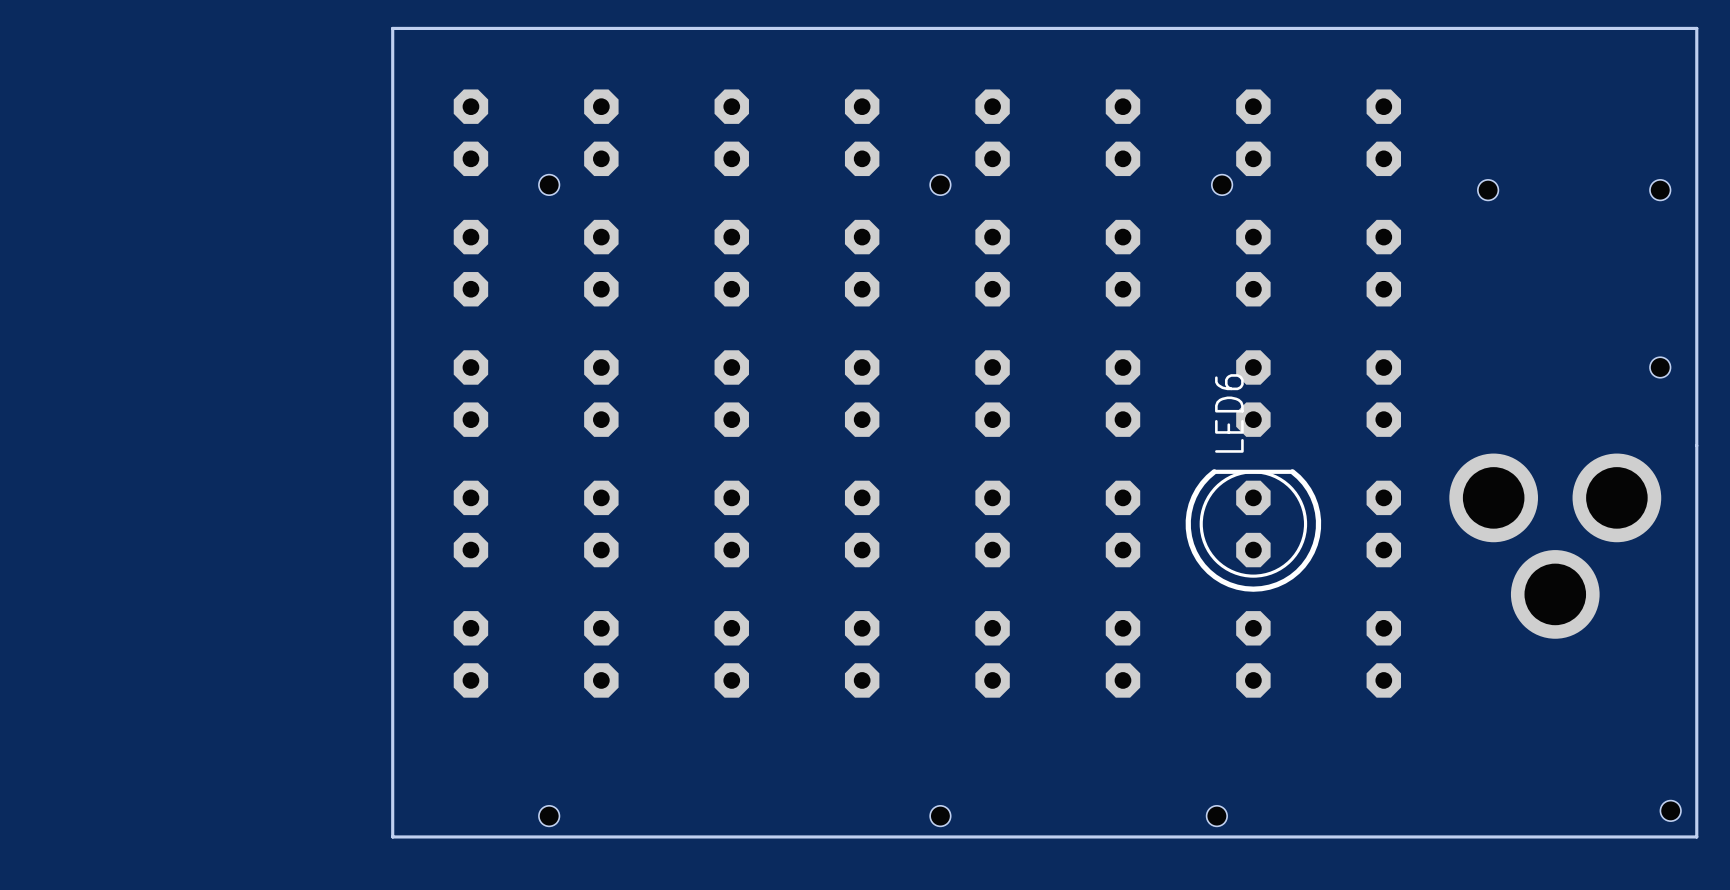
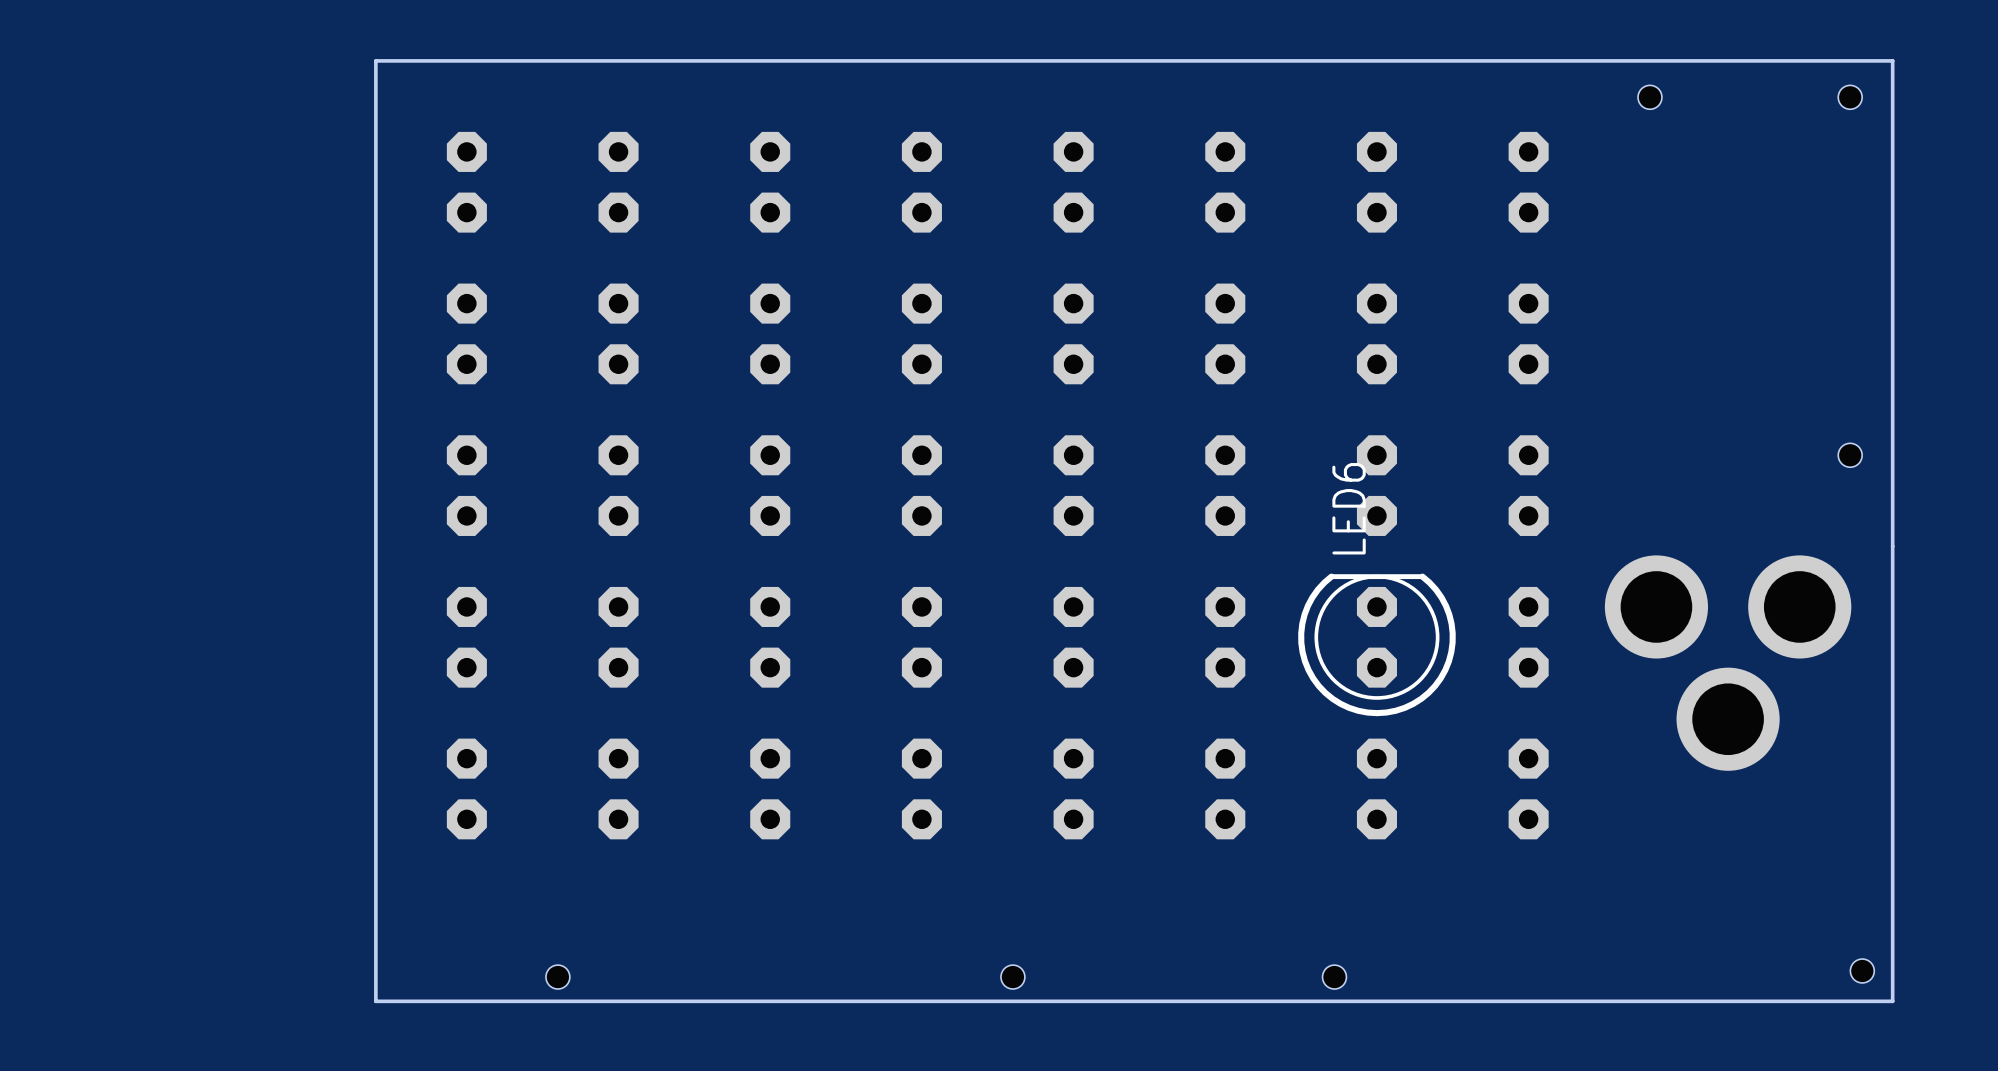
hole: none -> (1649, 97)
hole: none -> (1850, 97)
hole: (549, 184) -> none
hole: (940, 184) -> none
hole: (1222, 184) -> none
hole: (1488, 190) -> none
hole: (1660, 190) -> none

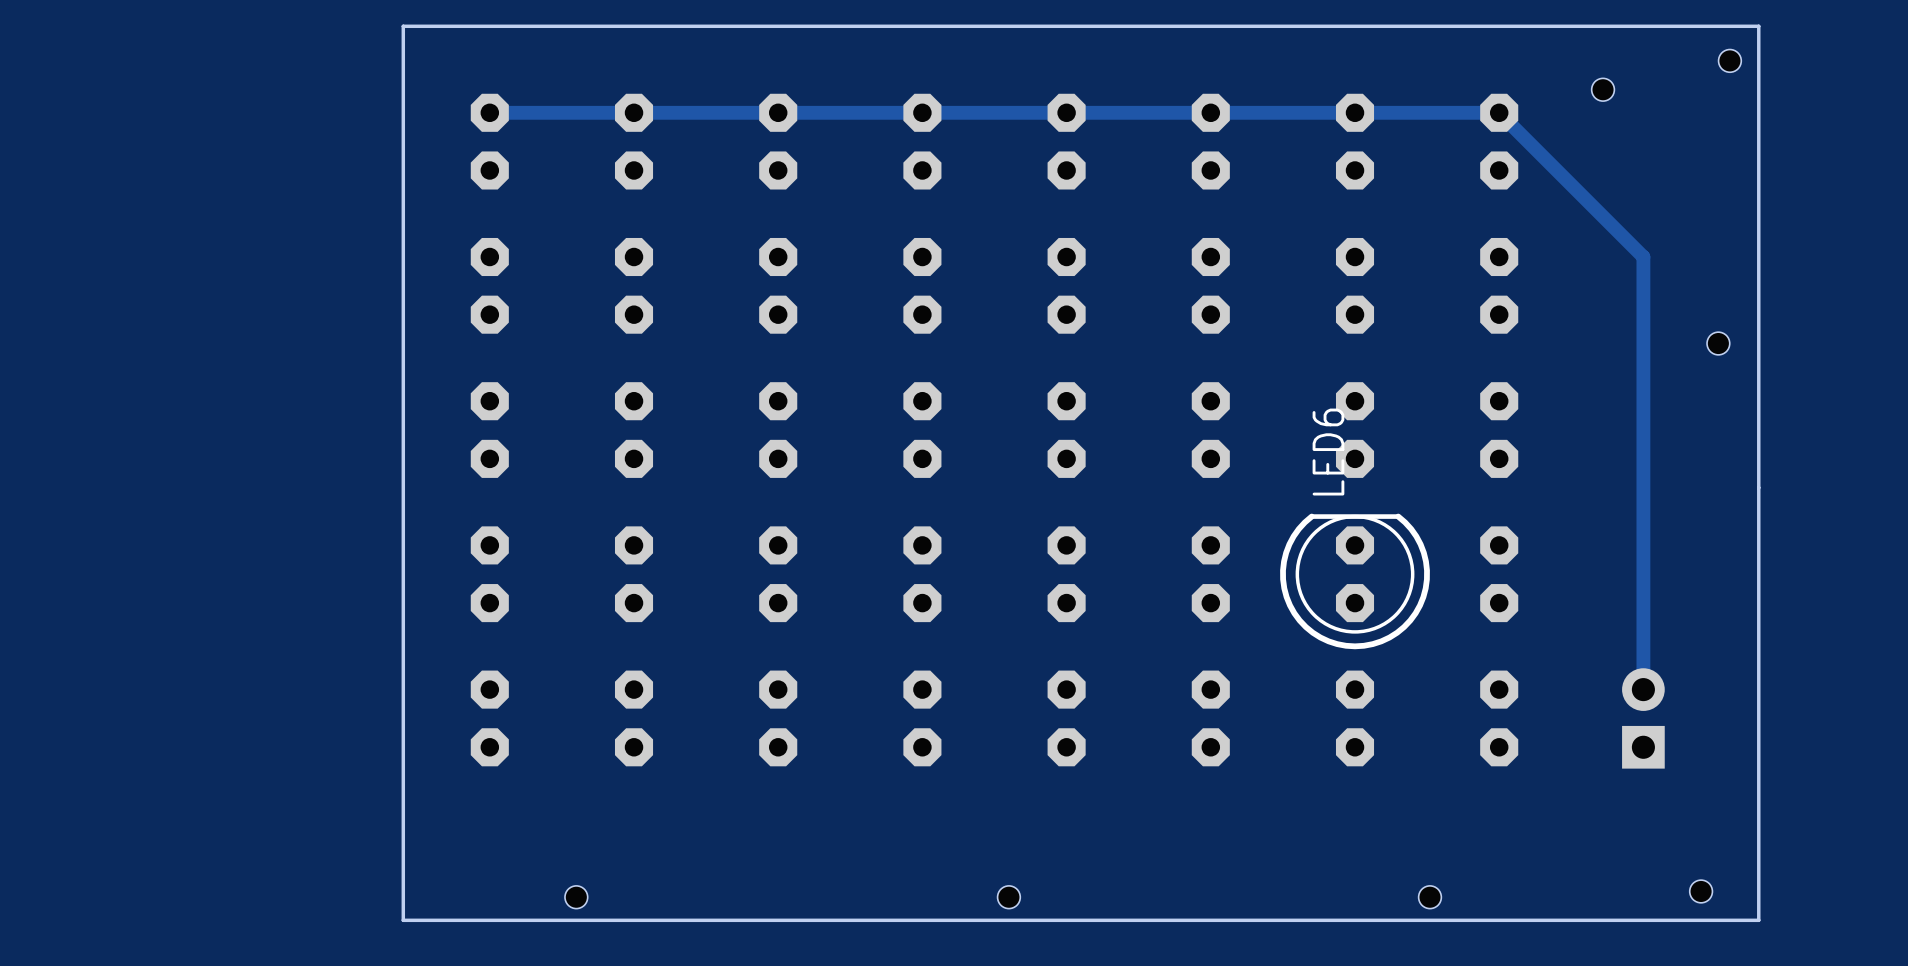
board edge: (1801, 60) (1892, 60) (1892, 1001) (1801, 1001) -> (1758, 26) (1758, 920)
hole position: (1649, 97) -> (1603, 89)
hole: none -> (1729, 60)
hole: (1850, 97) -> none
track: none -> (489, 112) (1499, 112) (1643, 257) (1643, 689)
hole position: (1850, 455) -> (1718, 343)
part: (1728, 663) -> none
part: none -> (1643, 718)
hole position: (1862, 970) -> (1701, 891)
hole position: (1334, 977) -> (1429, 897)

